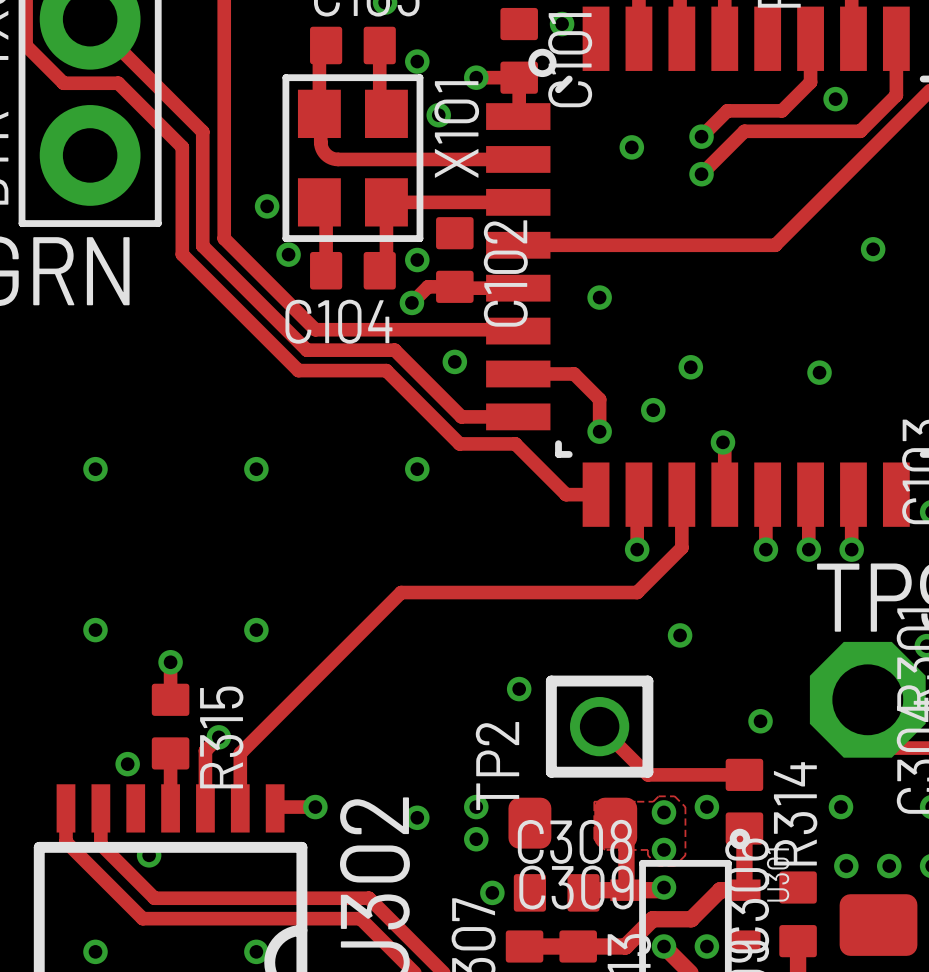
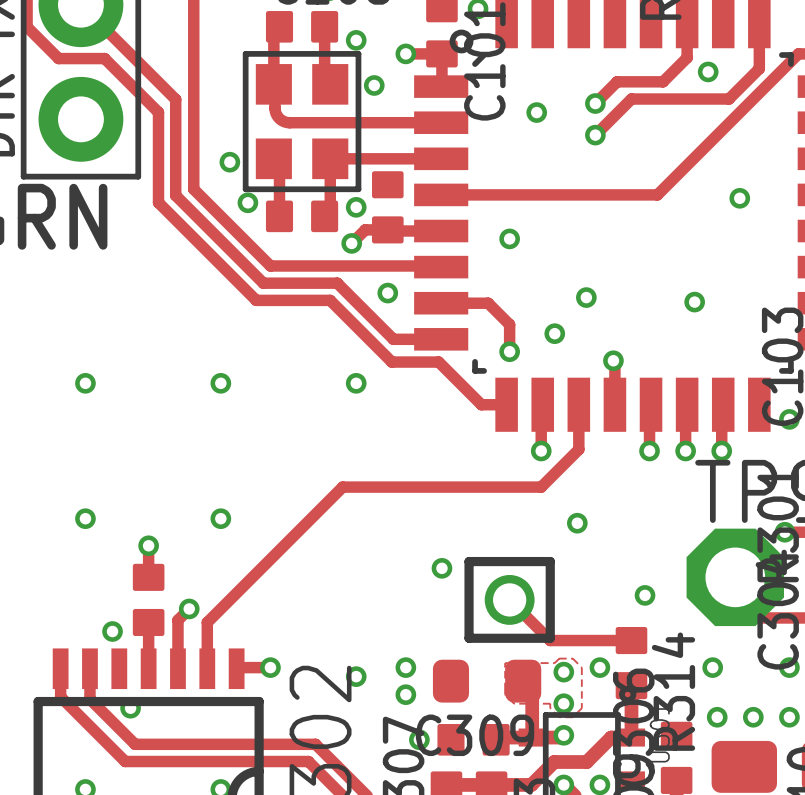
X101 name: X101 (456, 129) -> none
C102 name: C102 (505, 273) -> none
C104 name: C104 (338, 321) -> none
R315 name: R315 (221, 737) -> none
TP2 name: TP2 (497, 766) -> none
C308 name: C308 (575, 841) -> none

